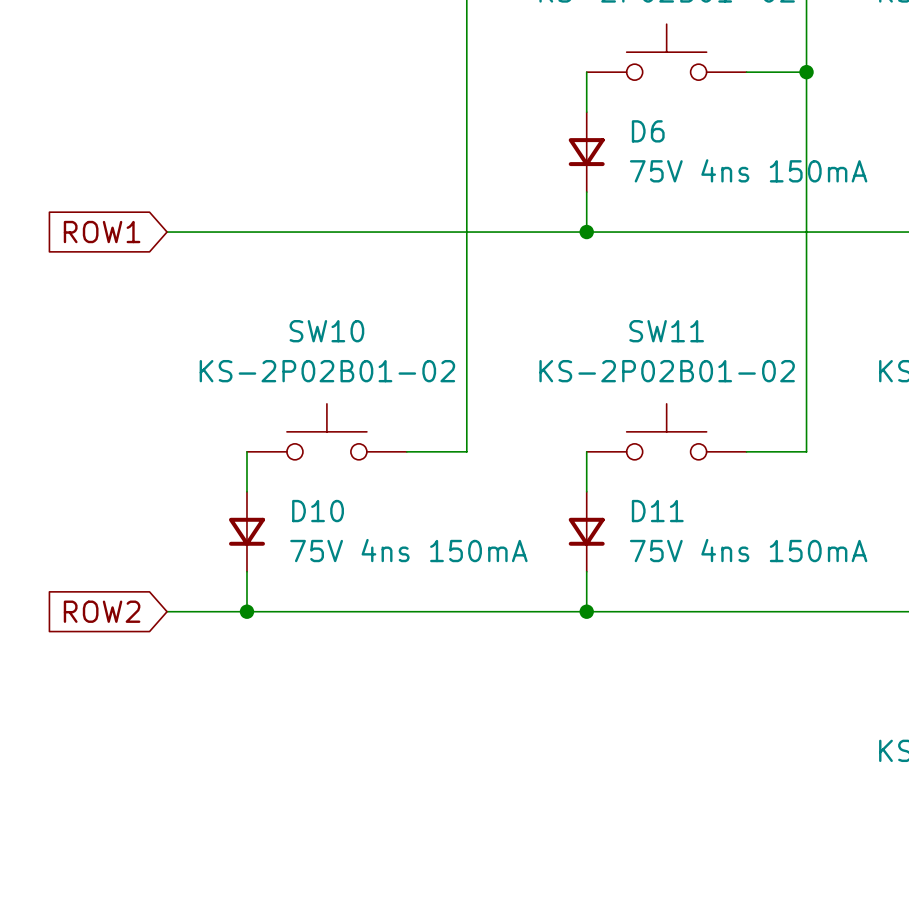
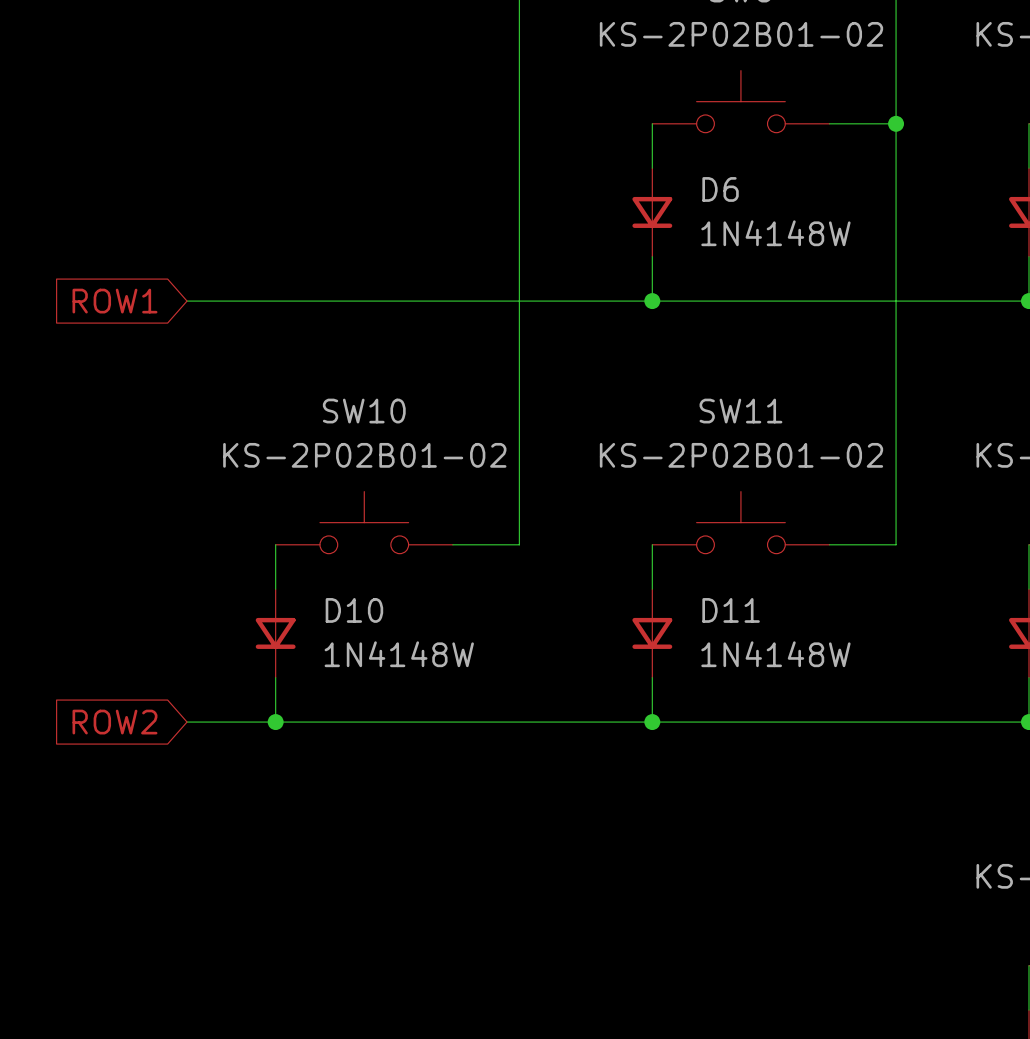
D6 value: 75V 4ns 150mA (748, 170) -> 1N4148W (775, 233)
D10 value: 75V 4ns 150mA (408, 550) -> 1N4148W (399, 654)
D11 value: 75V 4ns 150mA (748, 550) -> 1N4148W (775, 654)

